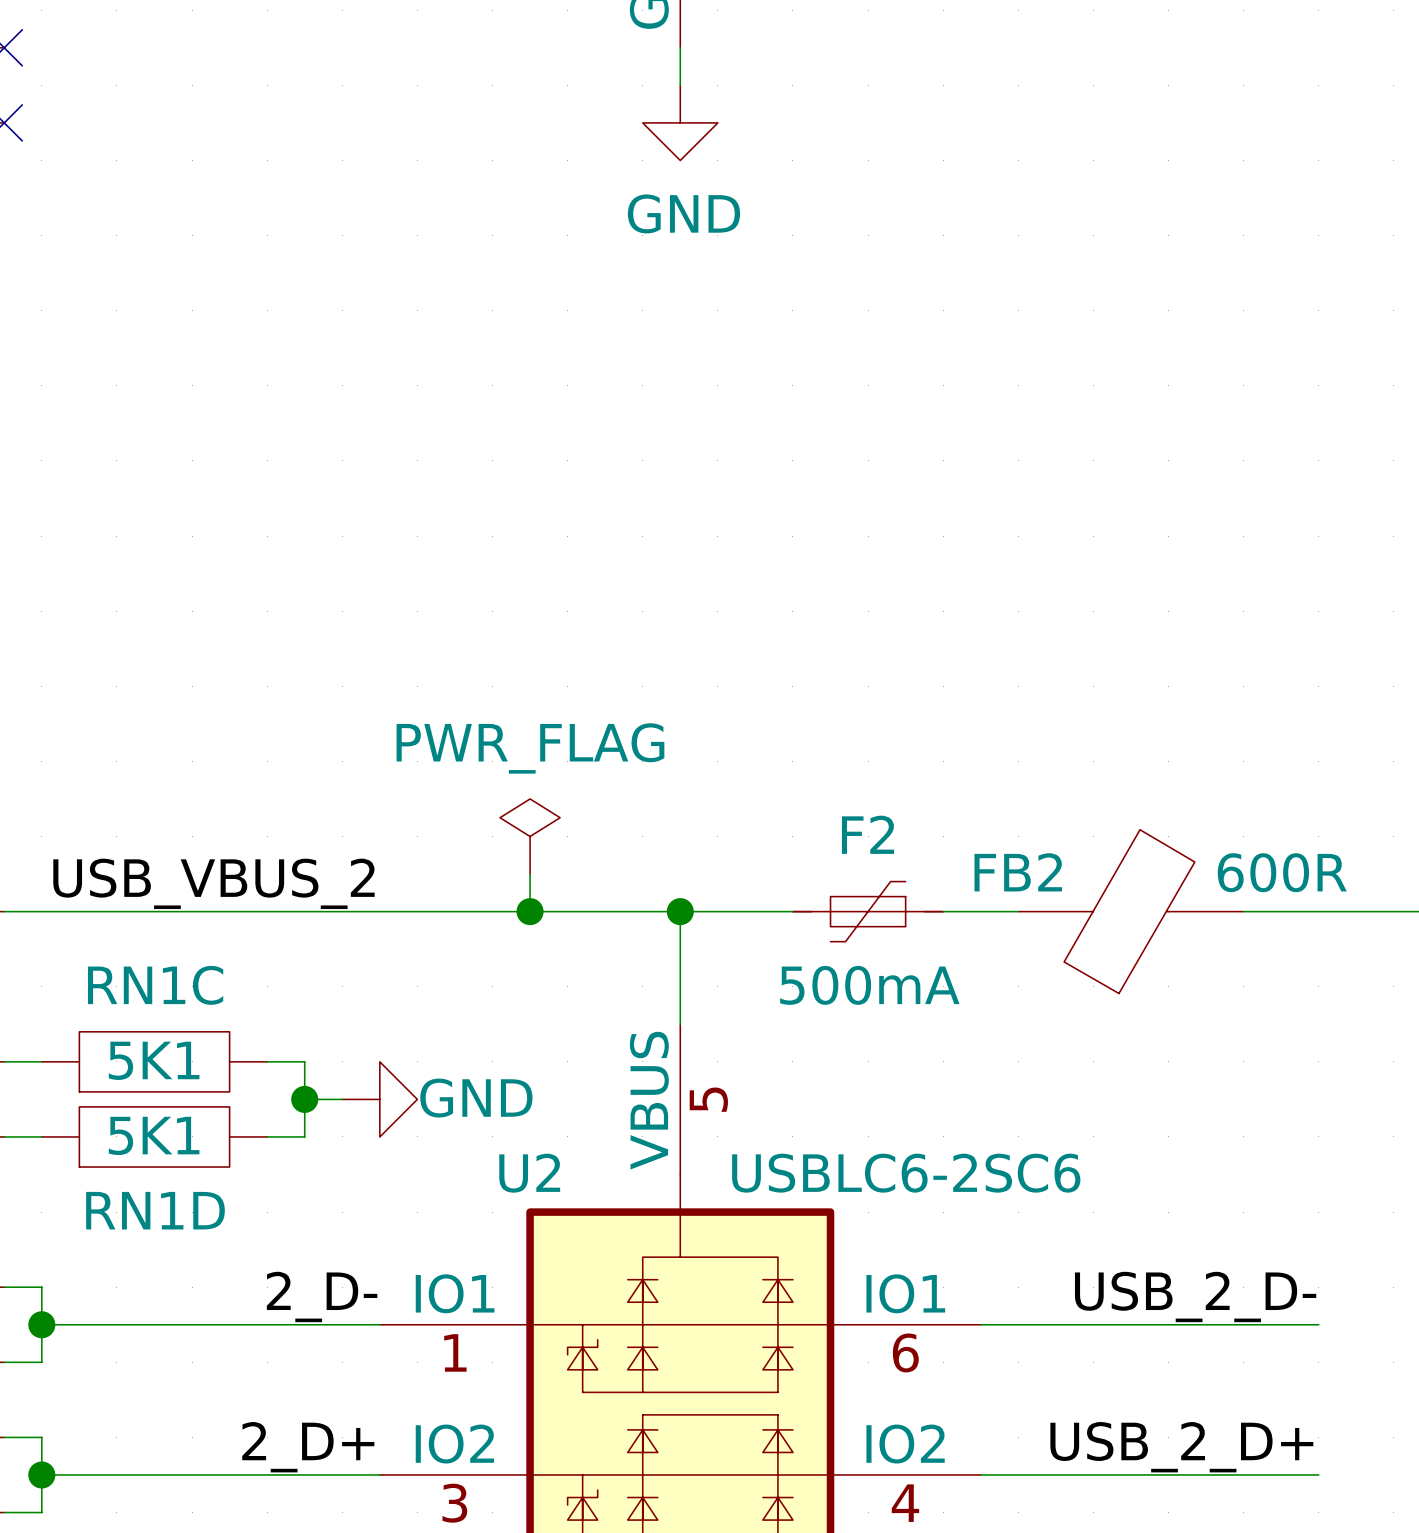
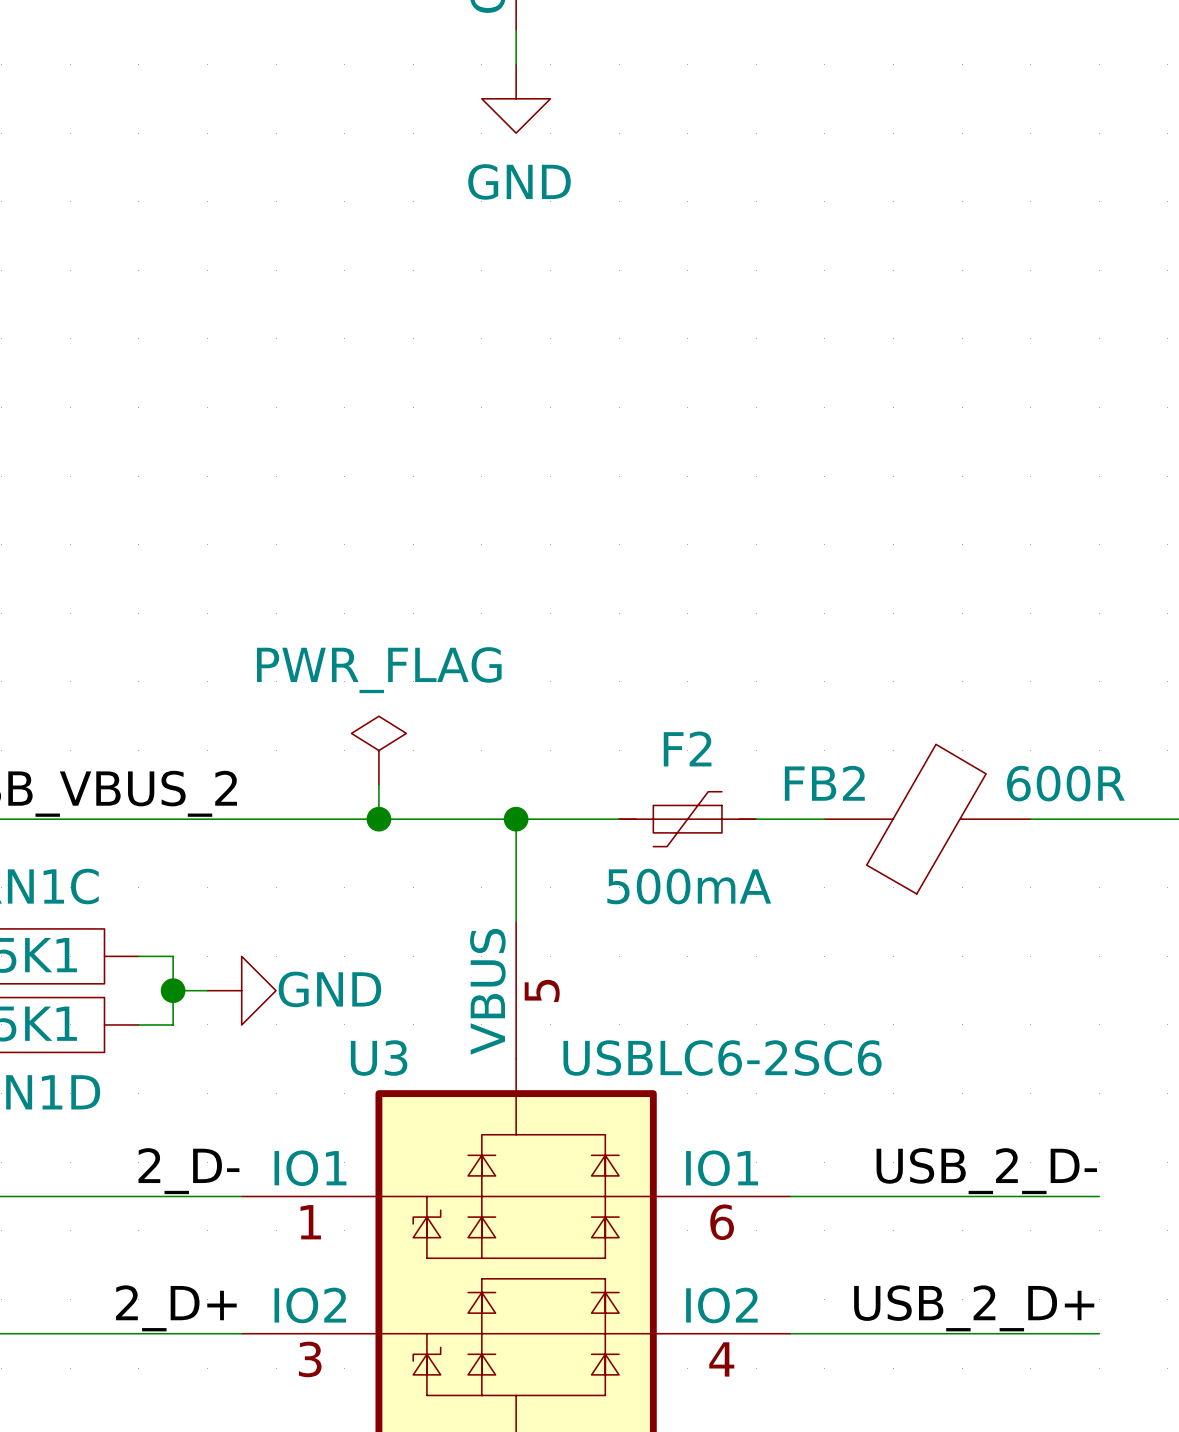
U2 name: U2 (529, 1173) -> U3 (379, 1058)

